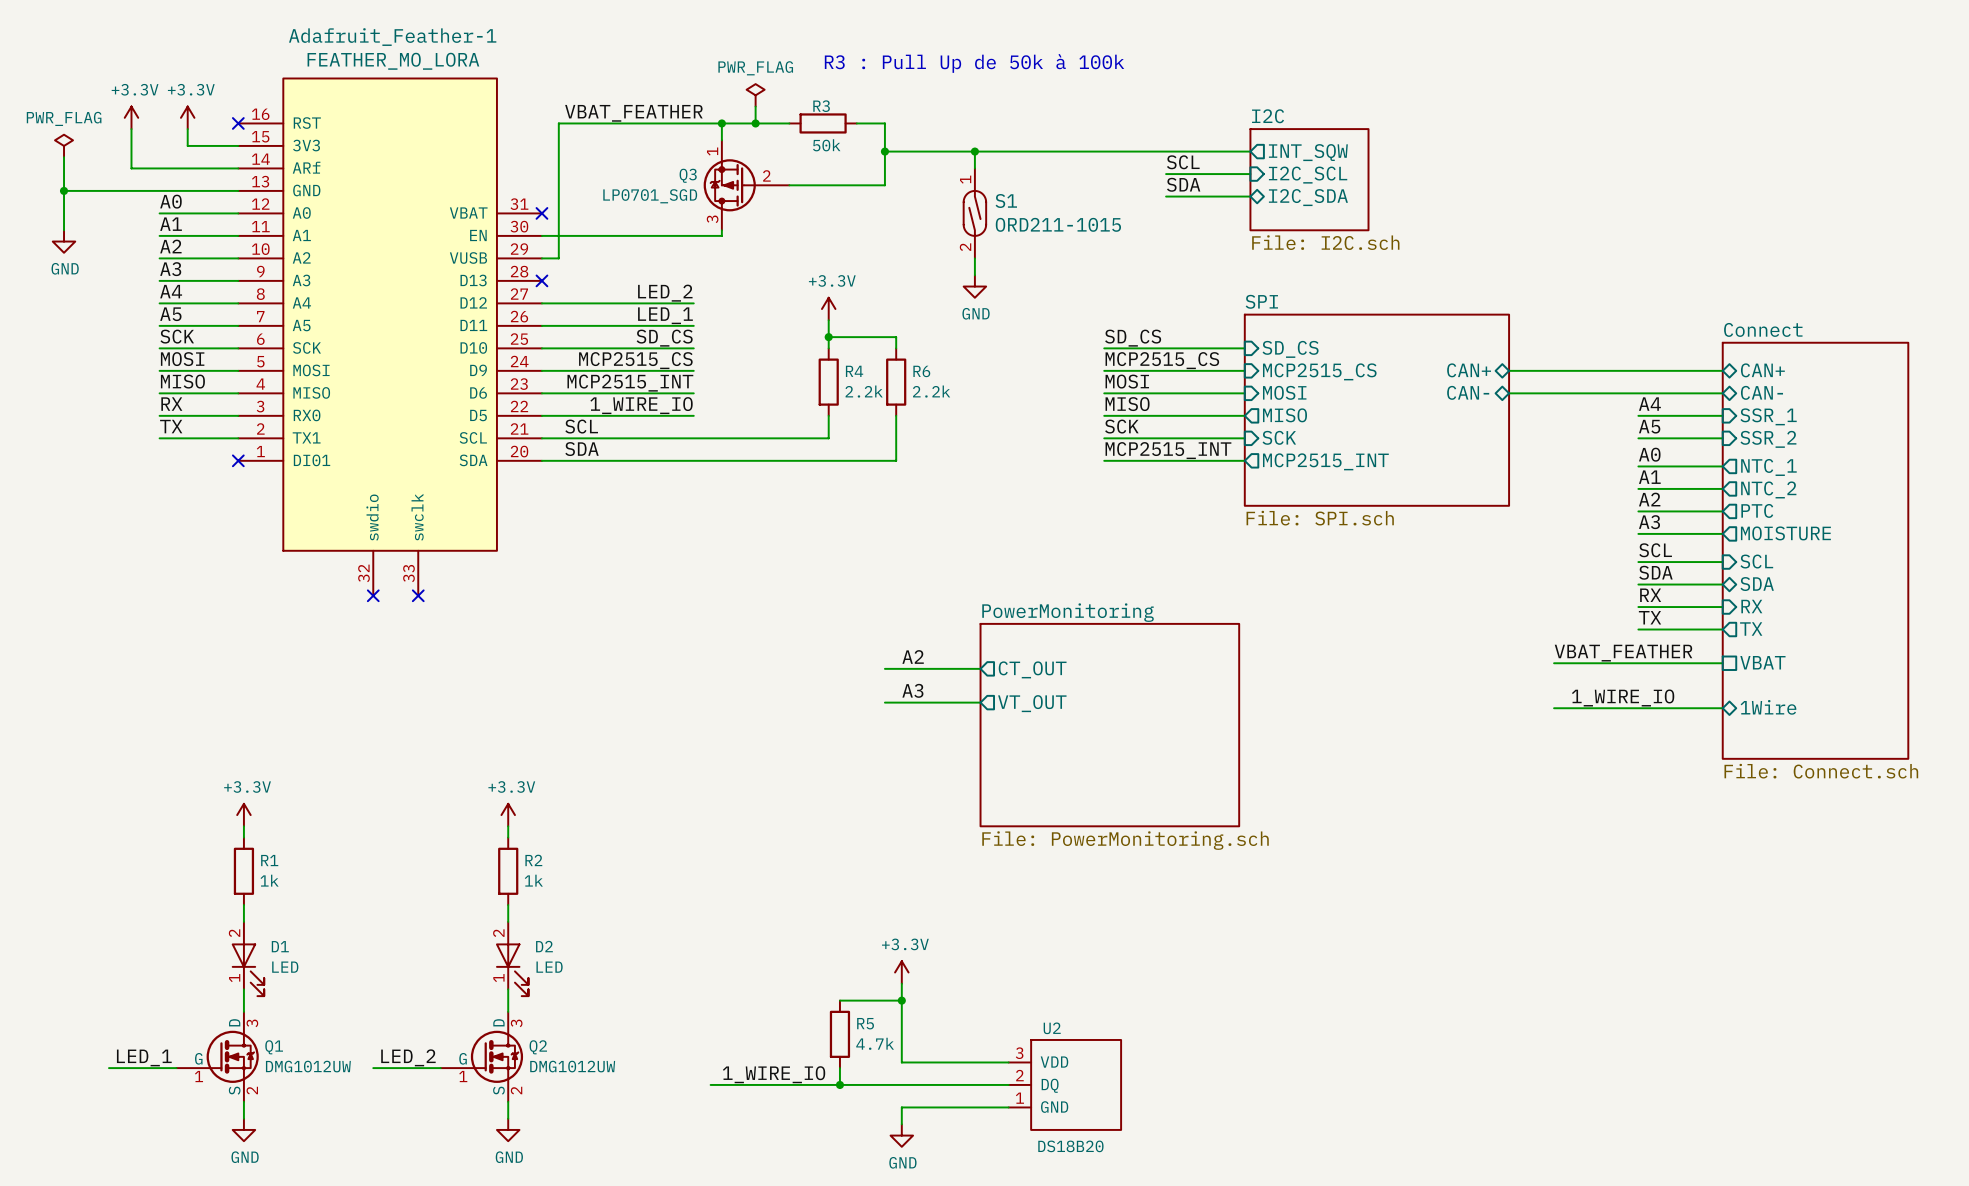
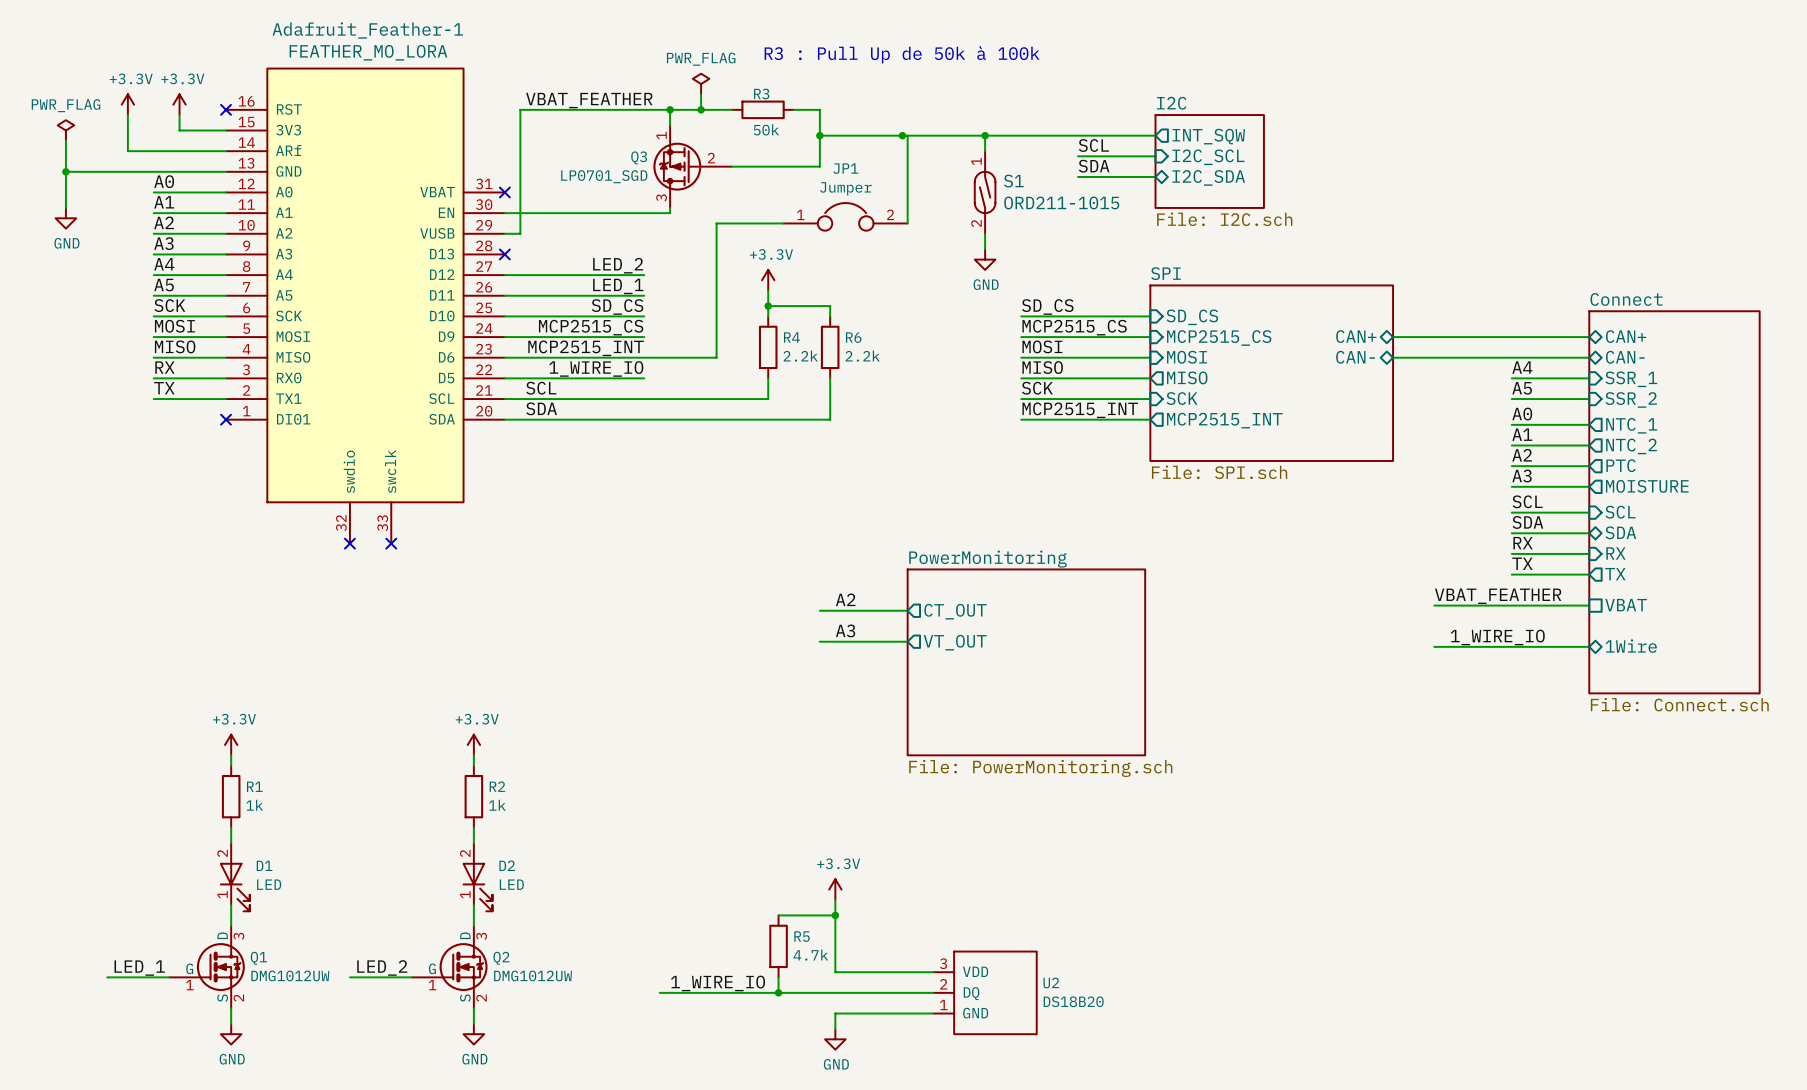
wire: (974, 151) (974, 168) -> (985, 135) (985, 151)
wire: none -> (907, 135) (907, 223)
junction: none -> (985, 135)
S1 position: (974, 213) -> (985, 192)
JP1: none -> Jumper (845, 216)
wire: none -> (783, 223) (716, 223) (716, 357) (644, 357)
wire: (974, 258) (974, 275) -> (985, 233) (985, 249)
power symbol position: GND (974, 286) -> GND (985, 259)
U2 name position: U2 (1052, 1028) -> U2 (1051, 982)
U2 value position: DS18B20 (1070, 1146) -> DS18B20 (1073, 1001)

